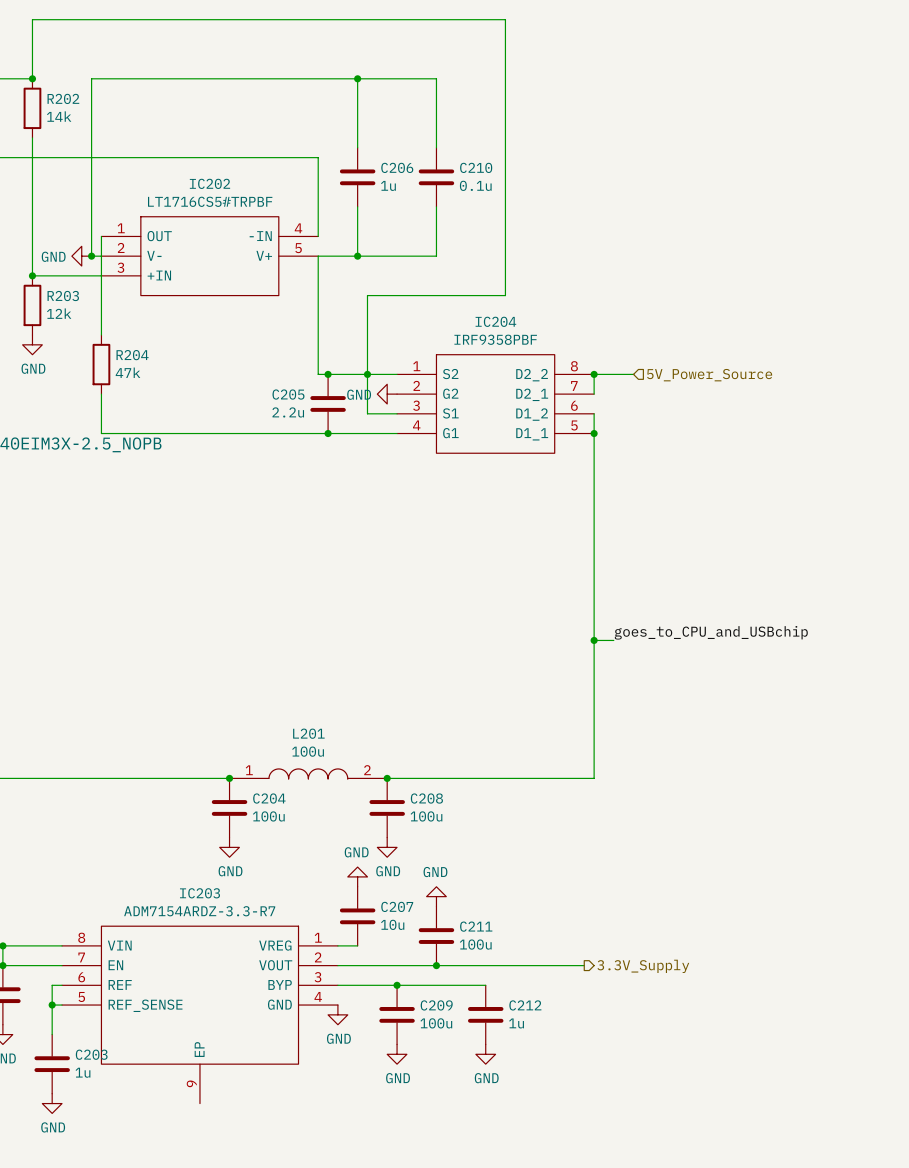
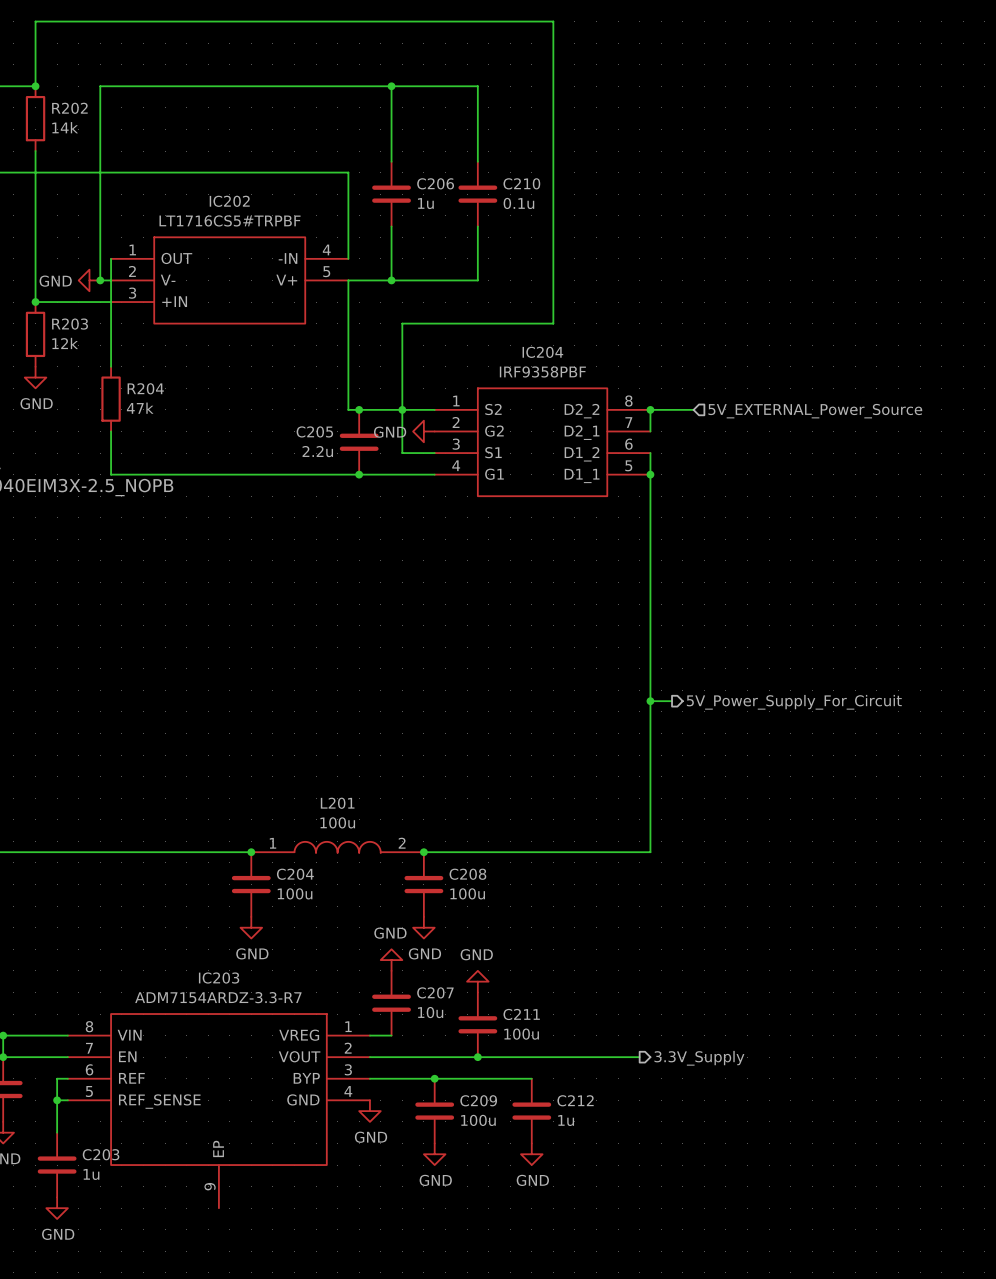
hierarchical label: 5V_Power_Source (709, 375) -> 5V_EXTERNAL_Power_Source (815, 411)
label: goes_to_CPU_and_USBchip (711, 632) -> none
hierarchical label: none -> 5V_Power_Supply_For_Circuit (794, 702)

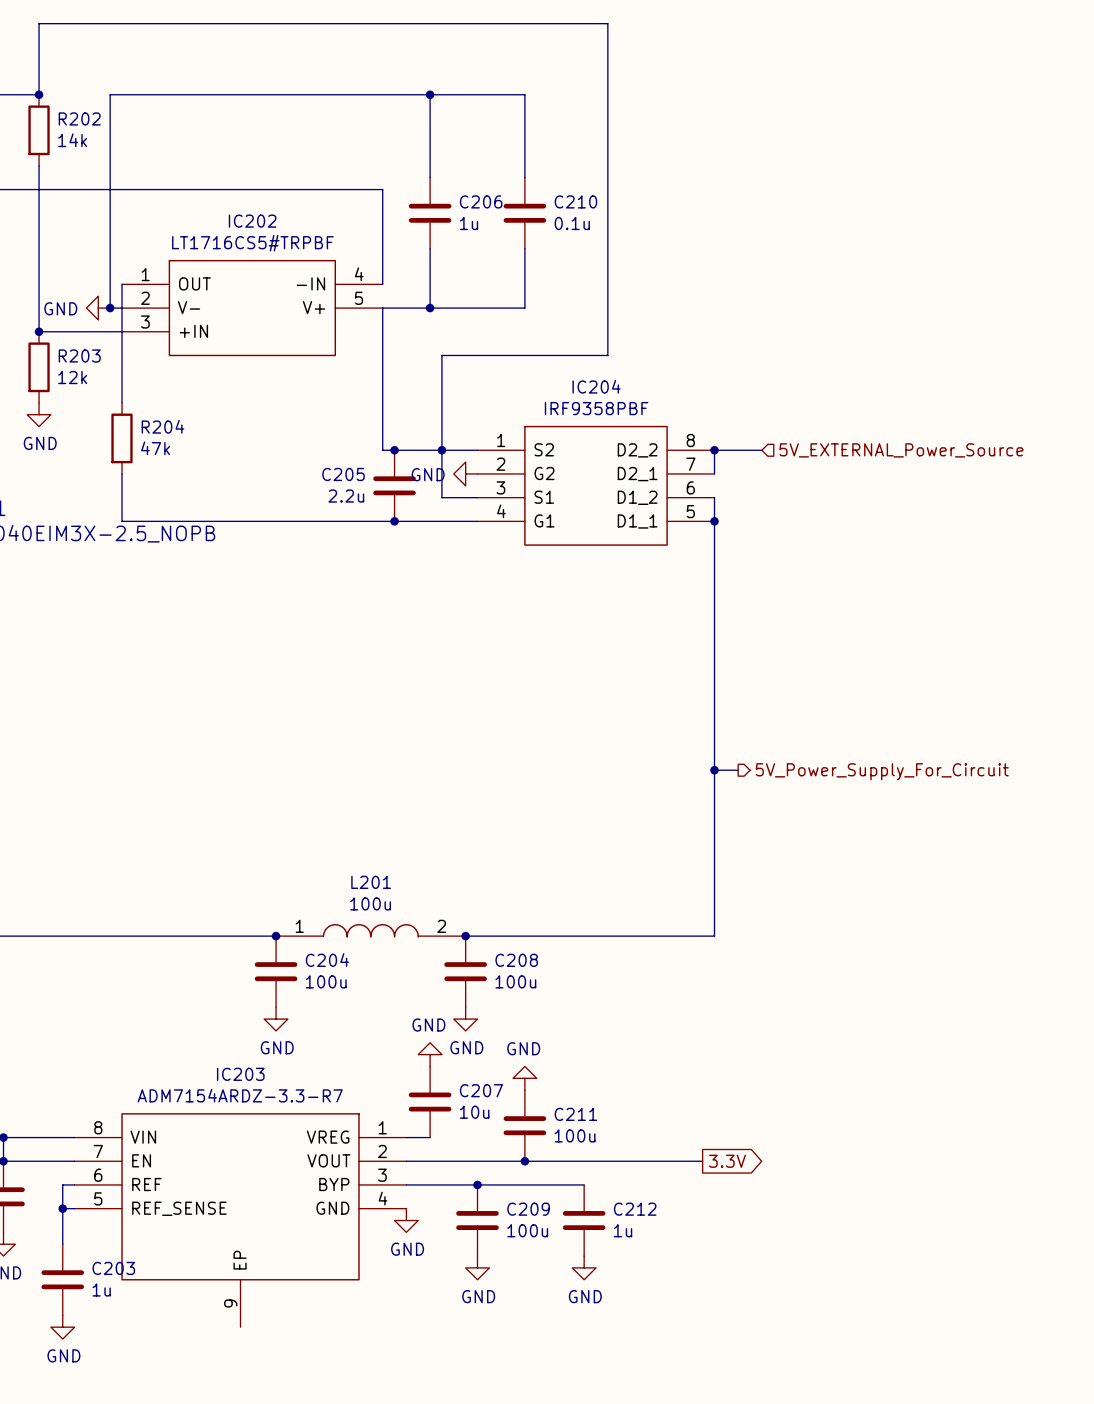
global label: none -> 3.3V (727, 1161)
hierarchical label: 3.3V_Supply (699, 1058) -> none

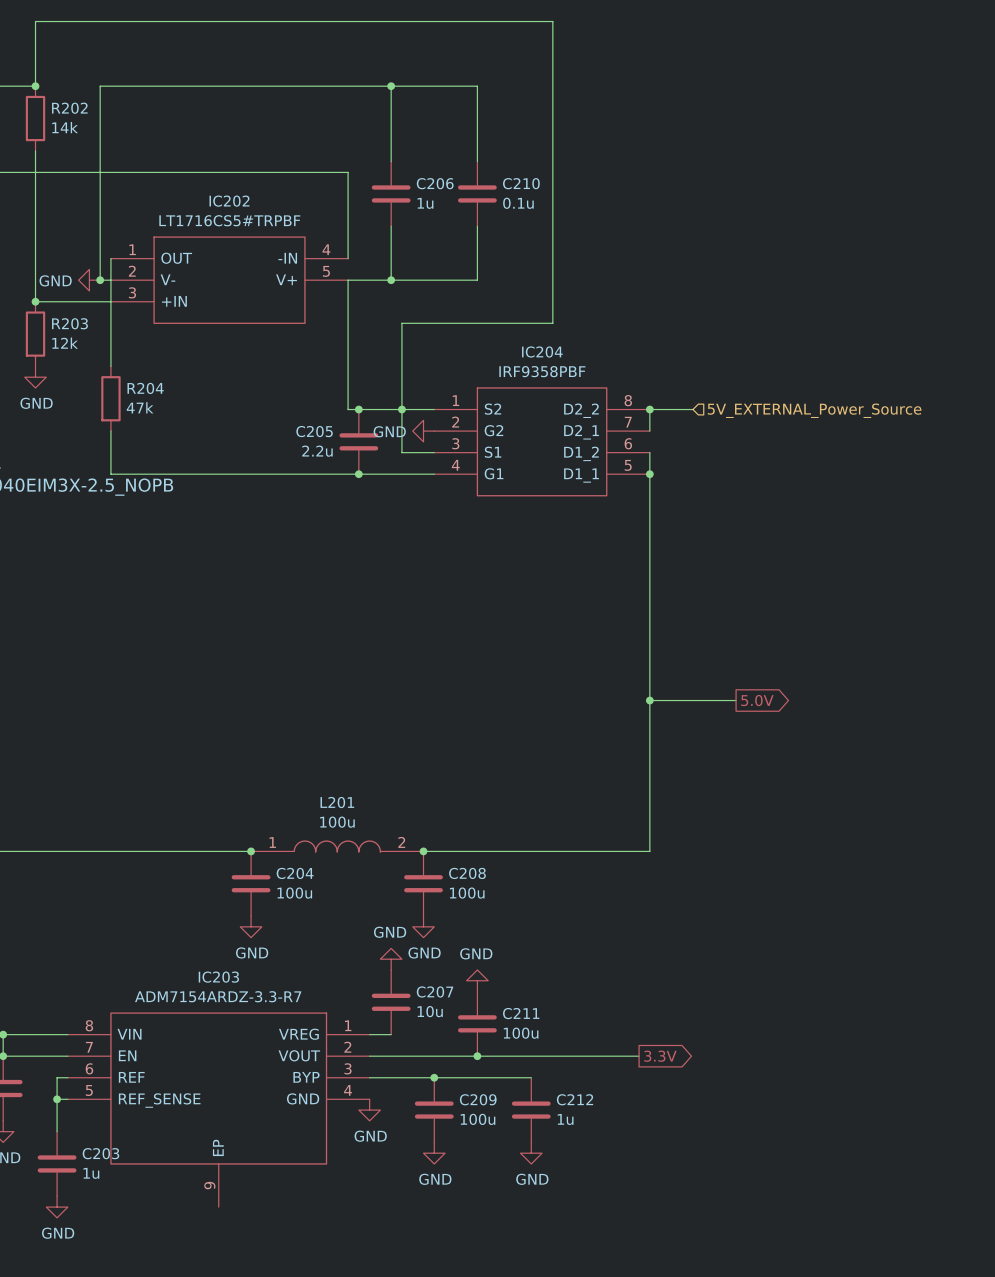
wire: none -> (671, 700) (736, 700)
global label: none -> 5.0V (757, 700)
hierarchical label: 5V_Power_Supply_For_Circuit (882, 771) -> none

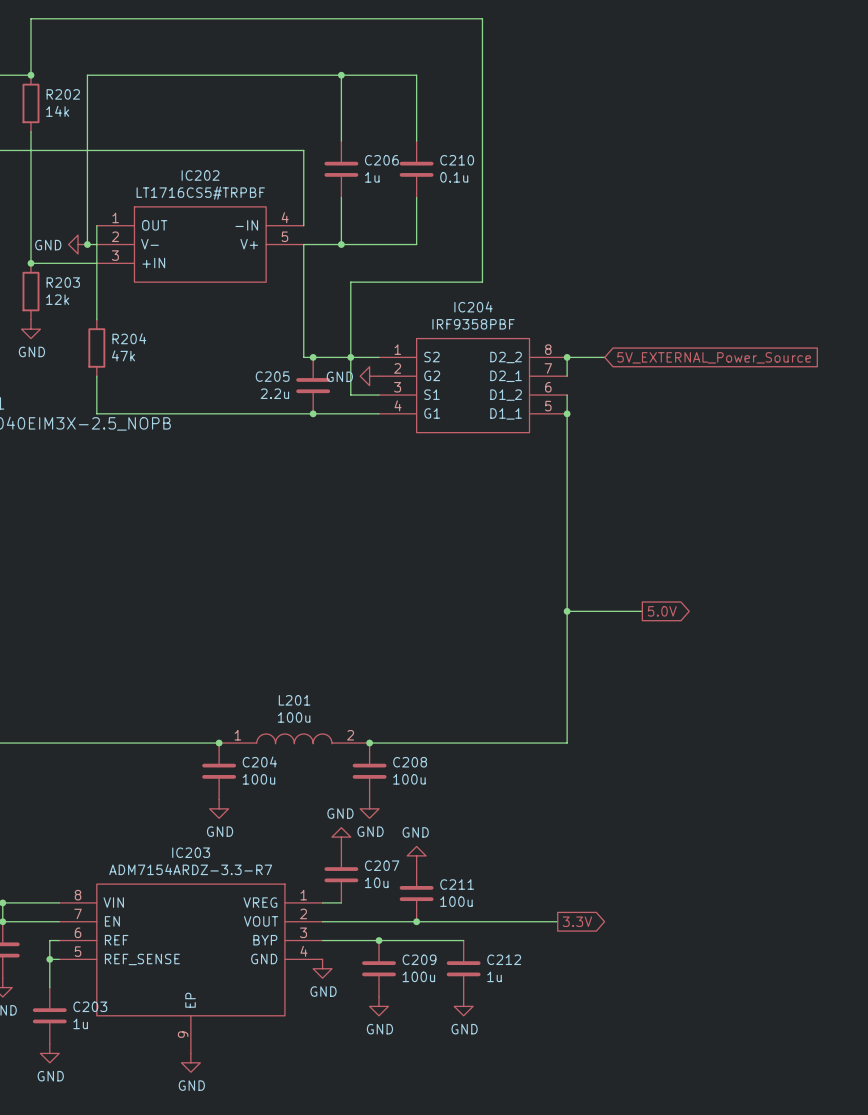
hierarchical label: 5V_EXTERNAL_Power_Source (814, 410) -> none
global label: none -> 5V_EXTERNAL_Power_Source (714, 357)
power symbol: none -> GND (190, 1062)

